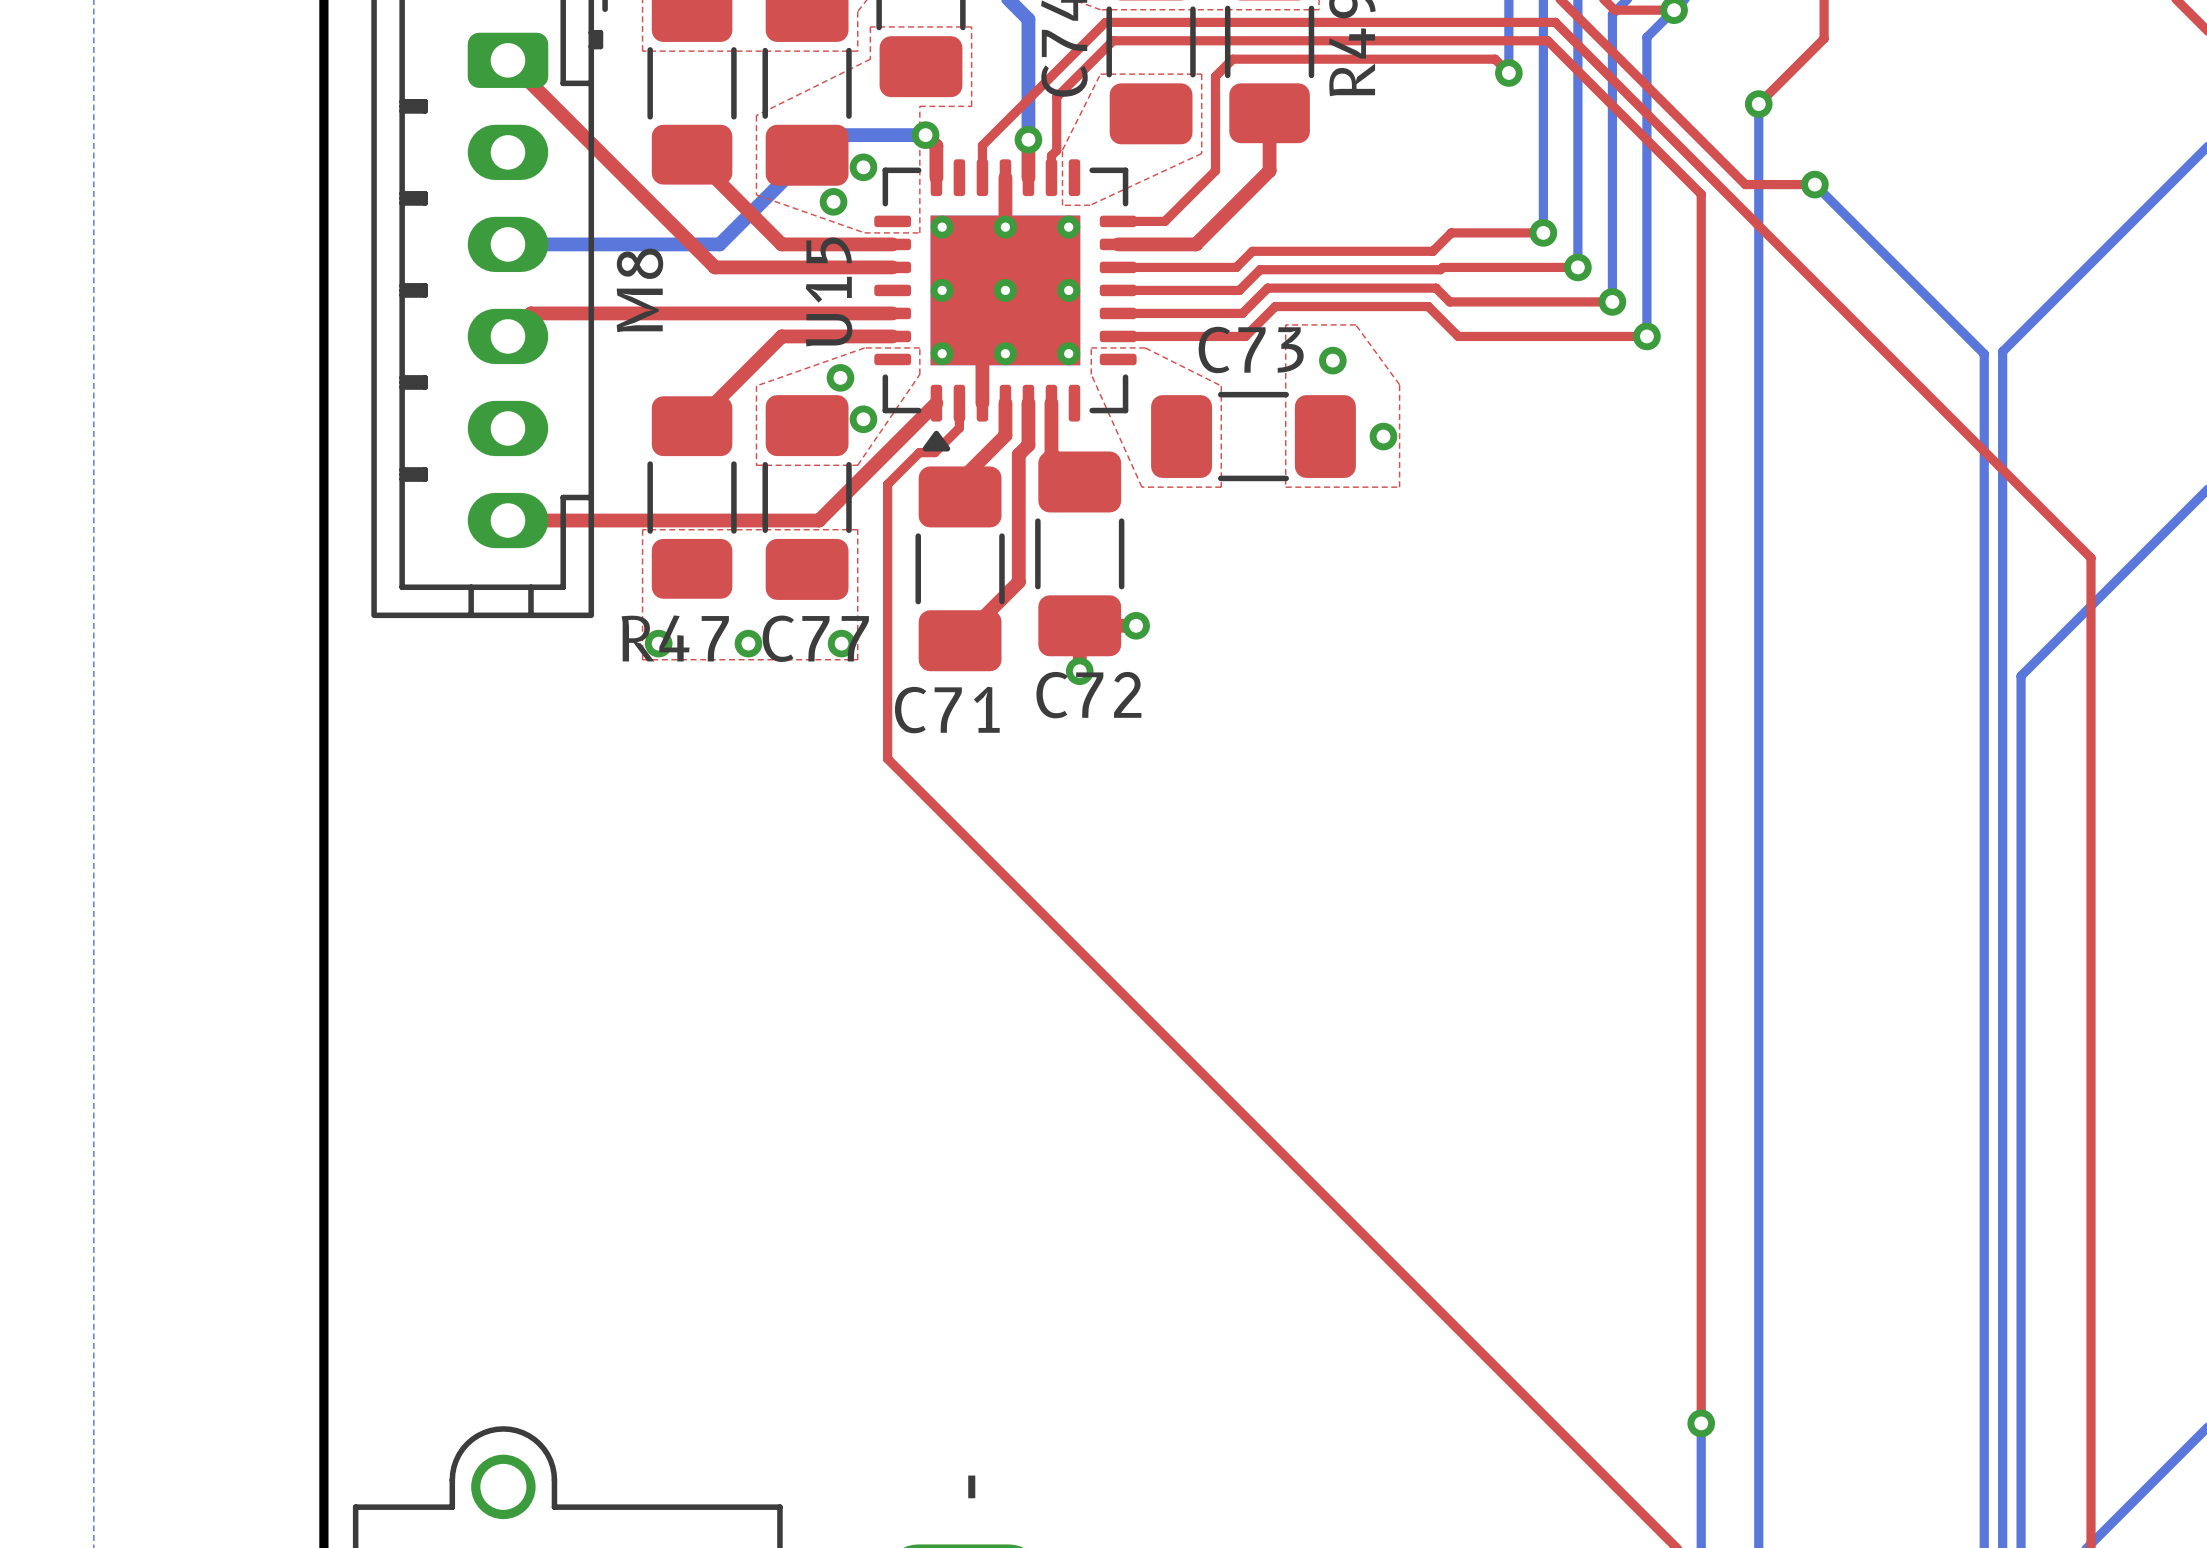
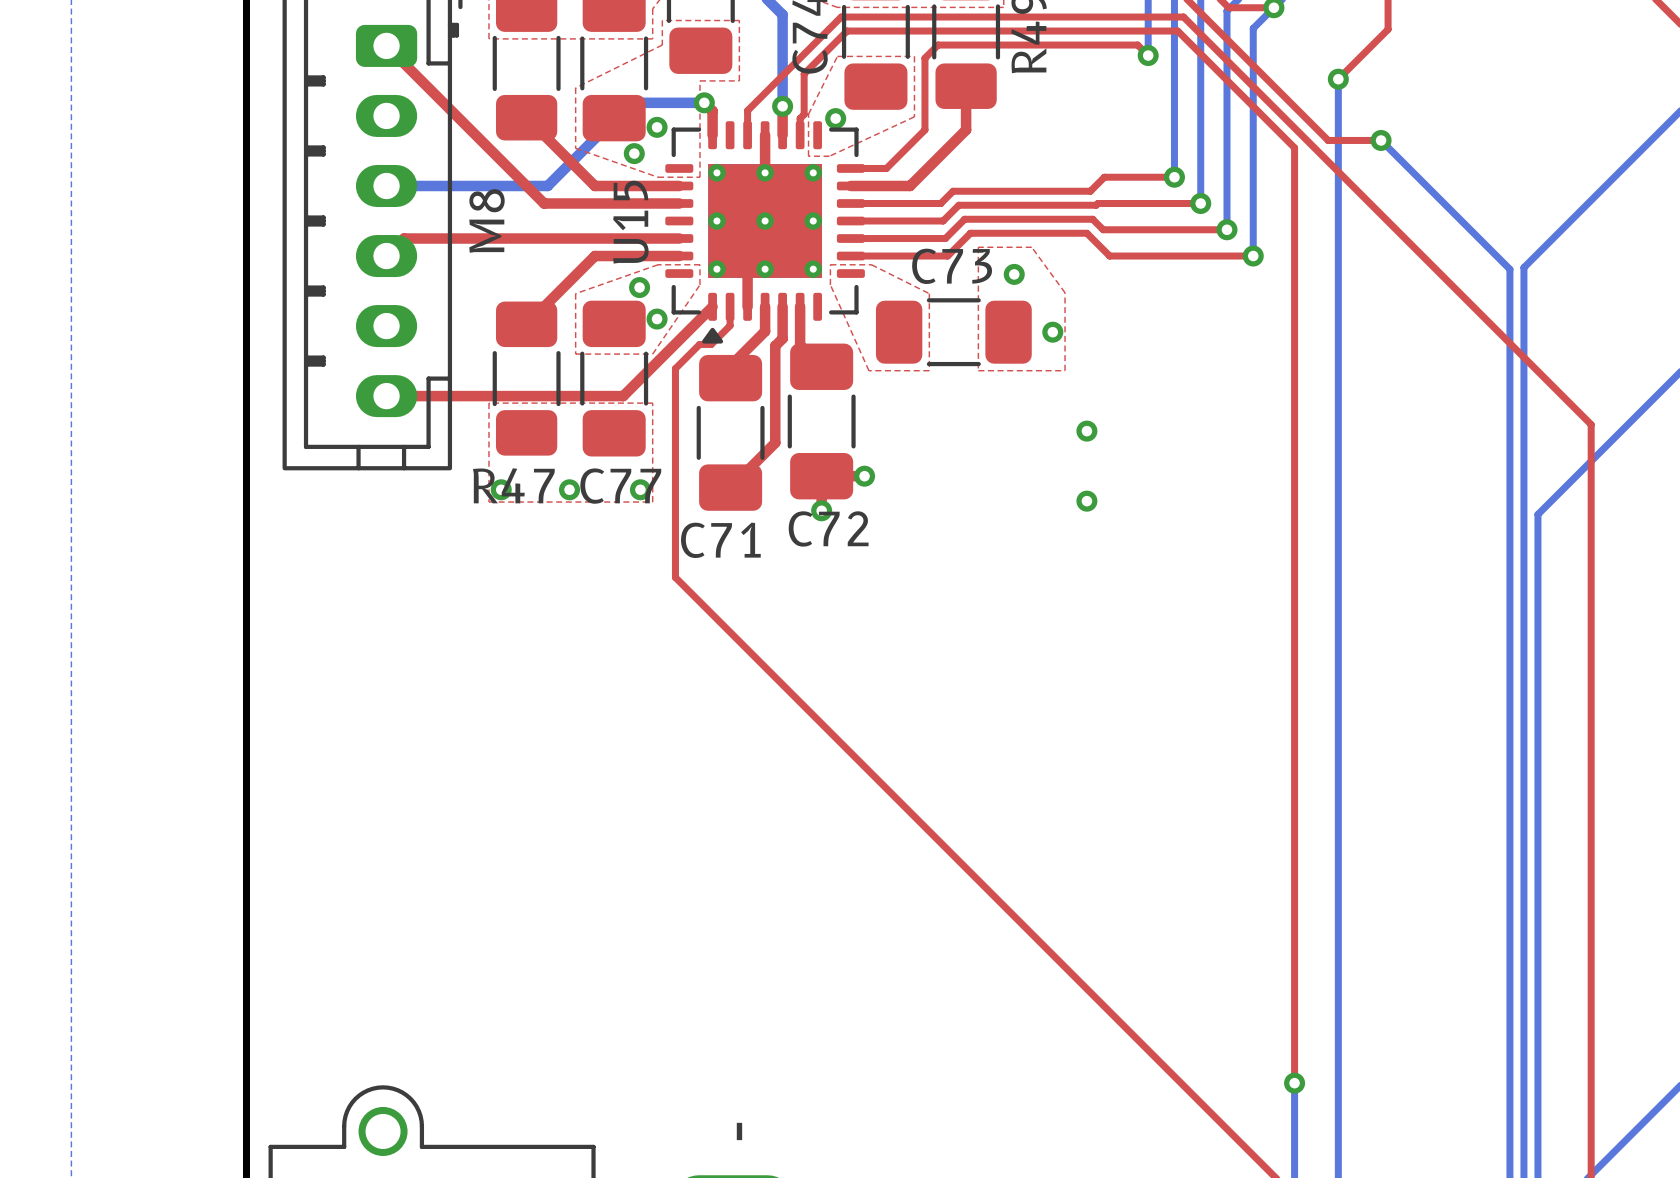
via: none -> (835, 118)
via: none -> (1086, 431)
via: none -> (1086, 501)

